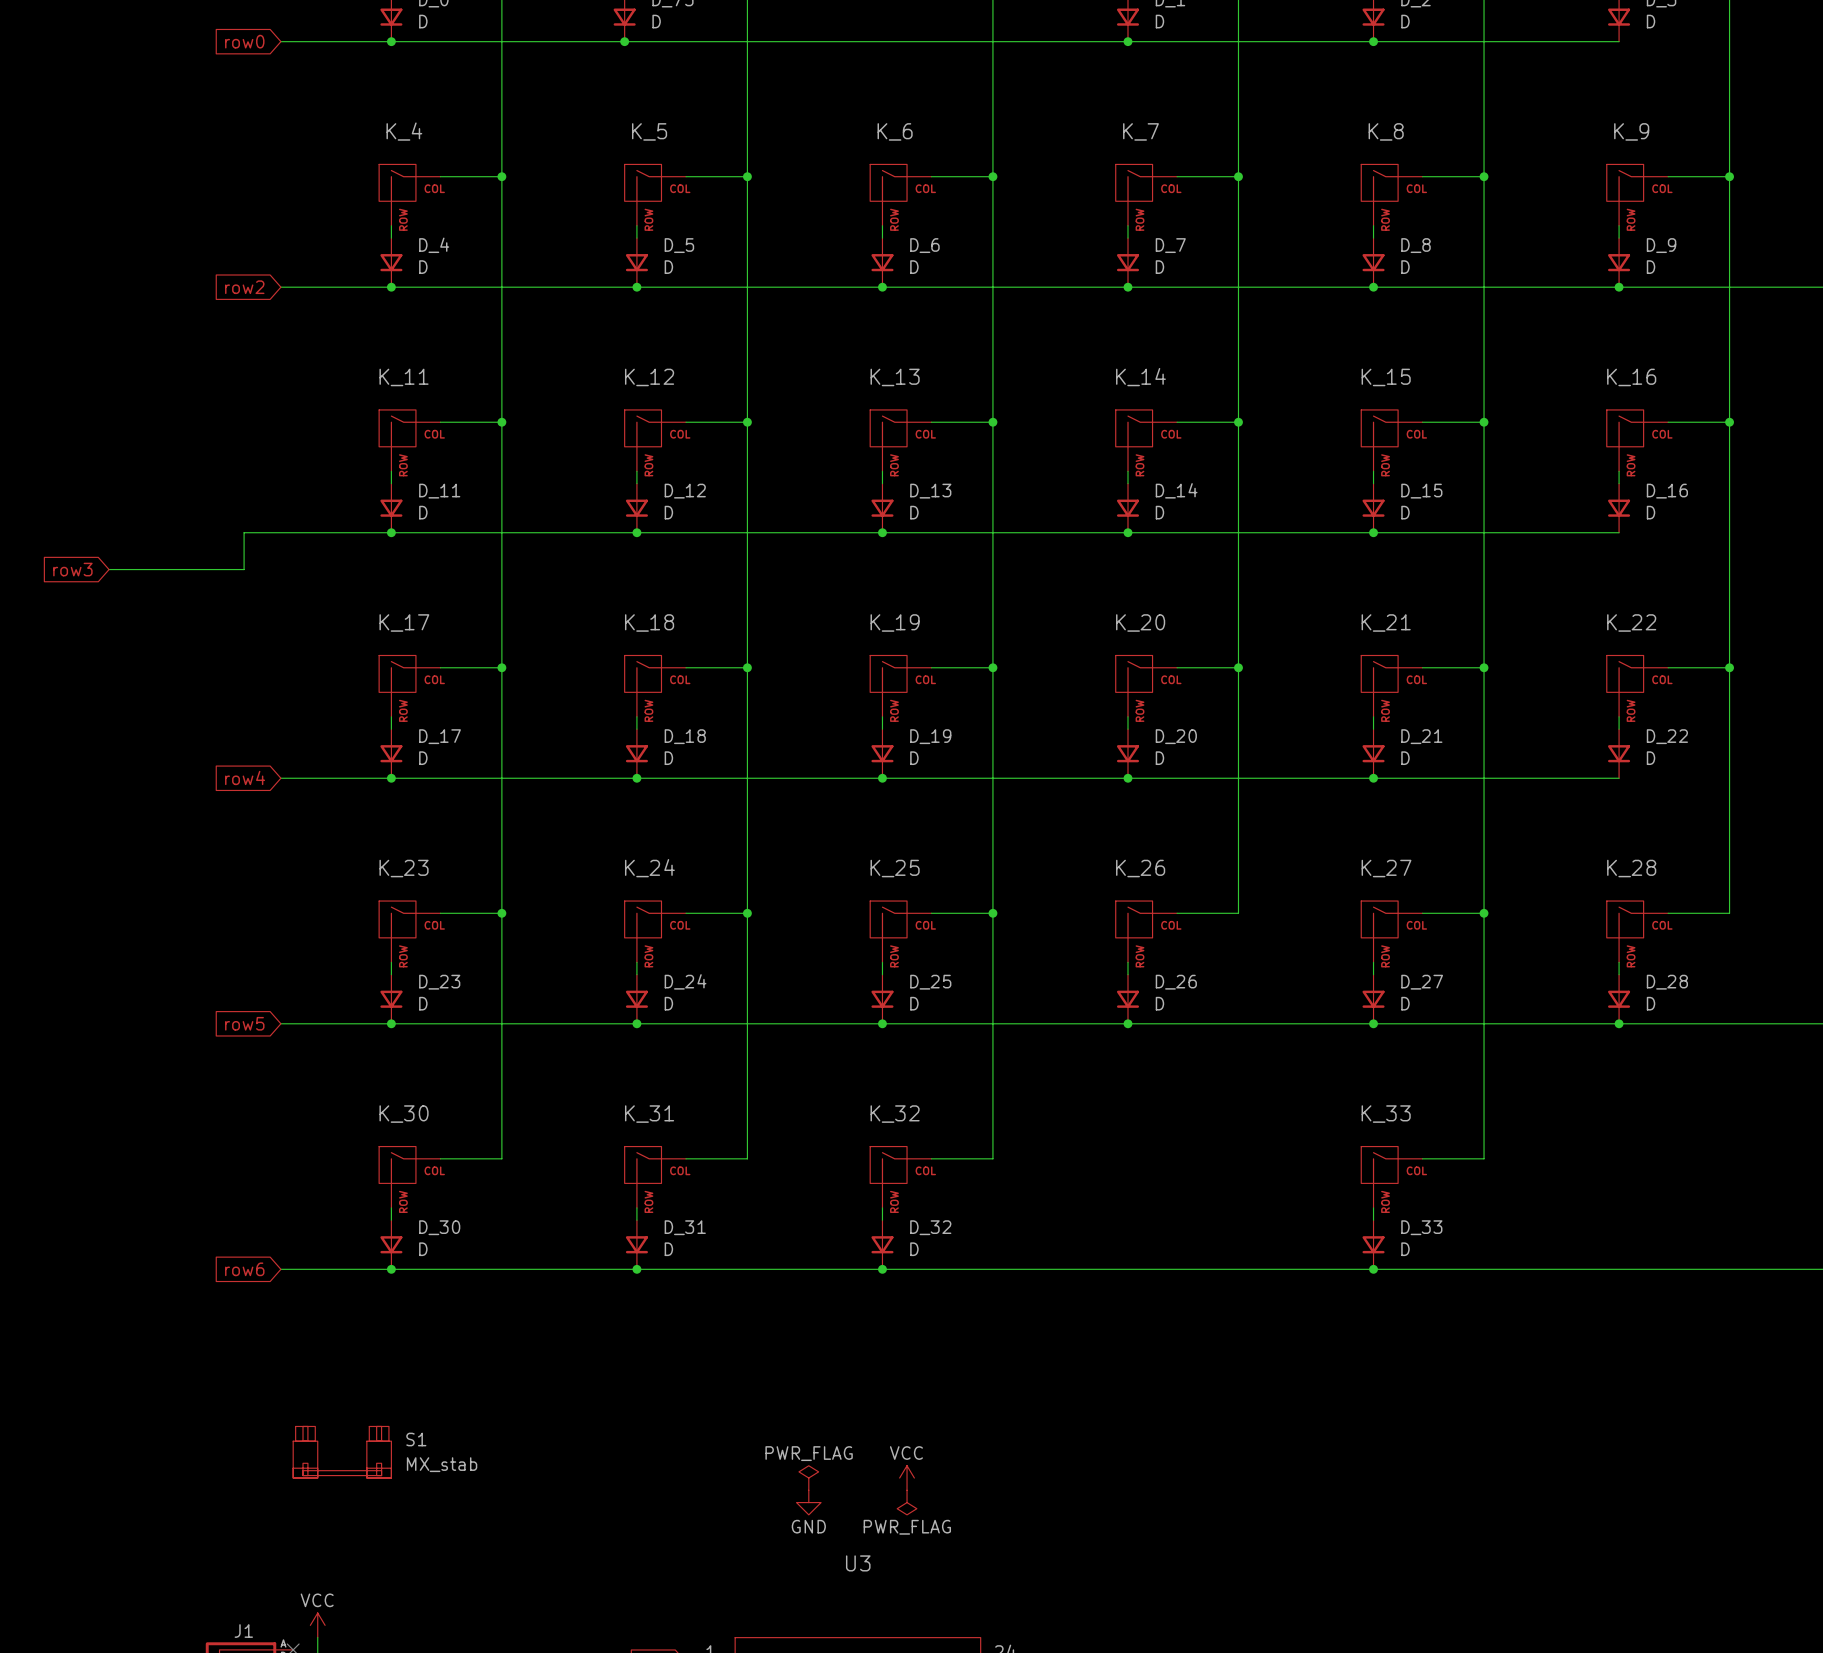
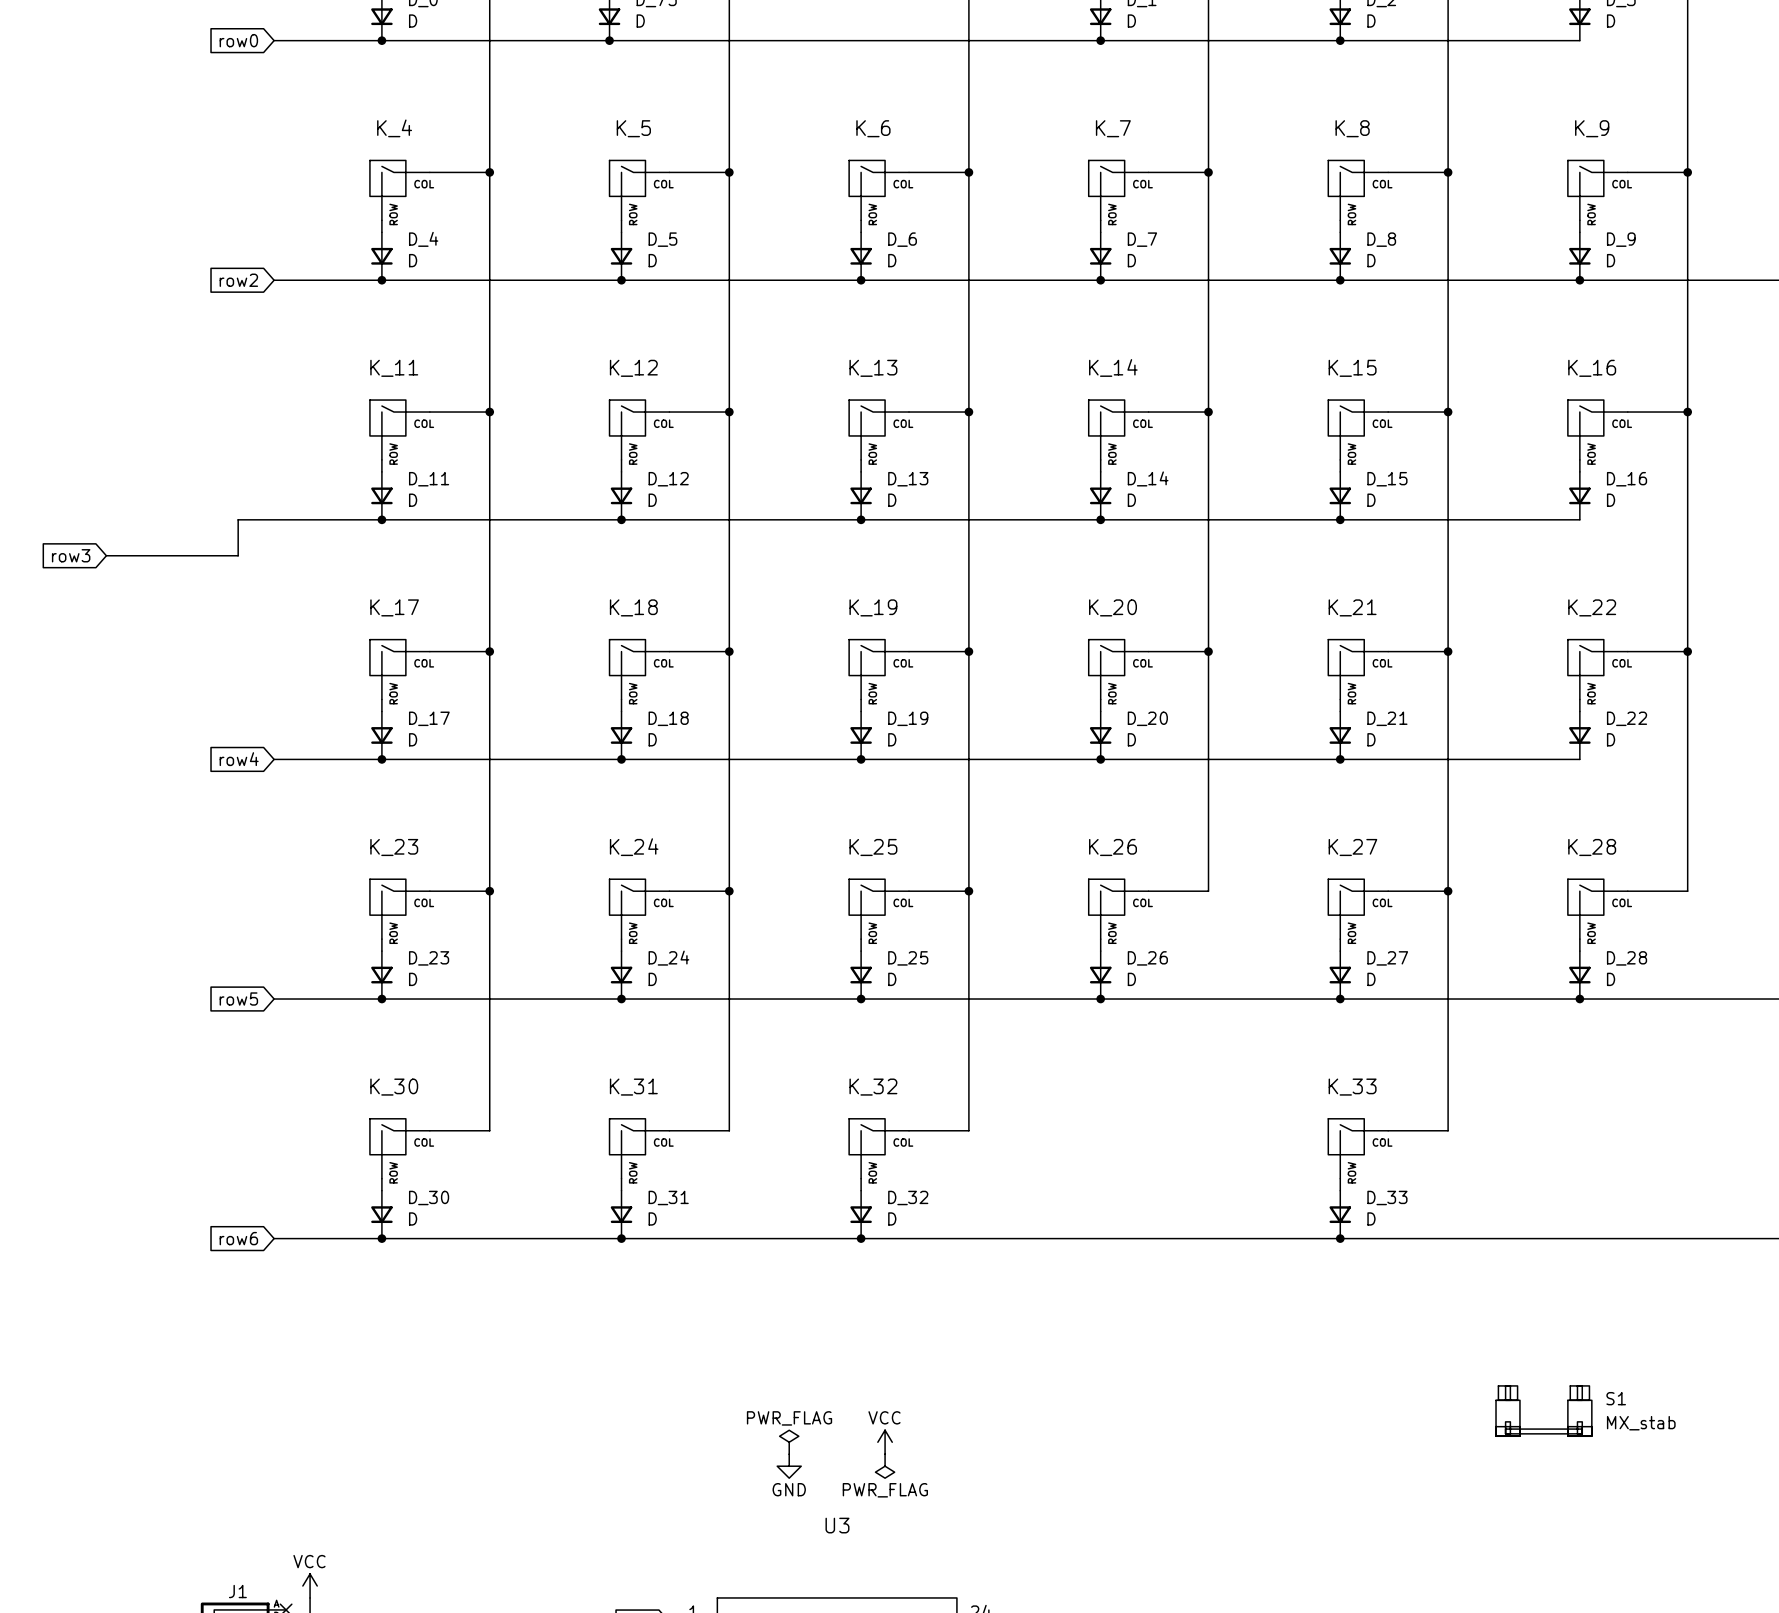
S1 position: (342, 1452) -> (1543, 1411)

